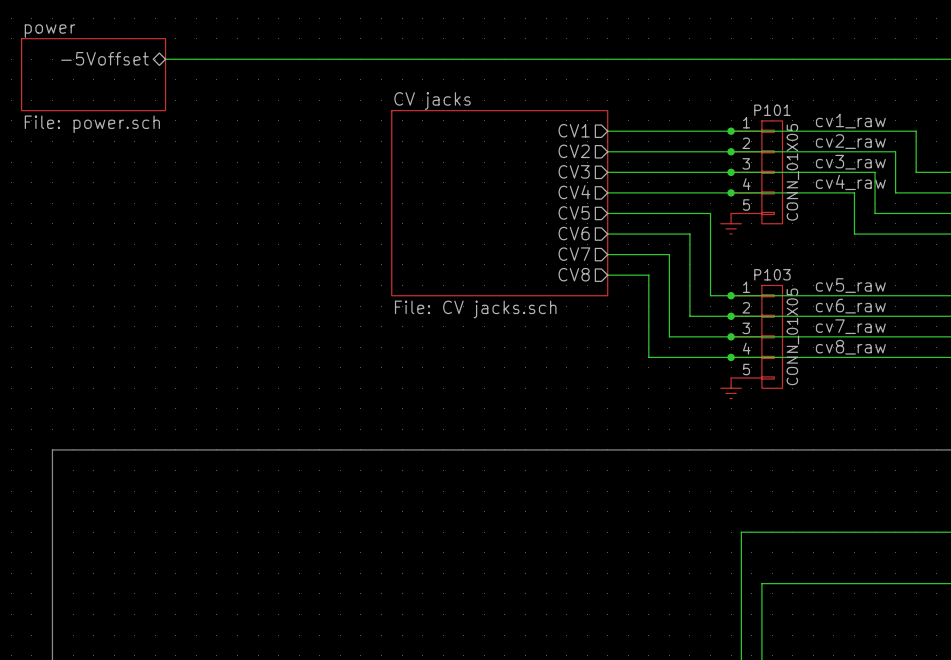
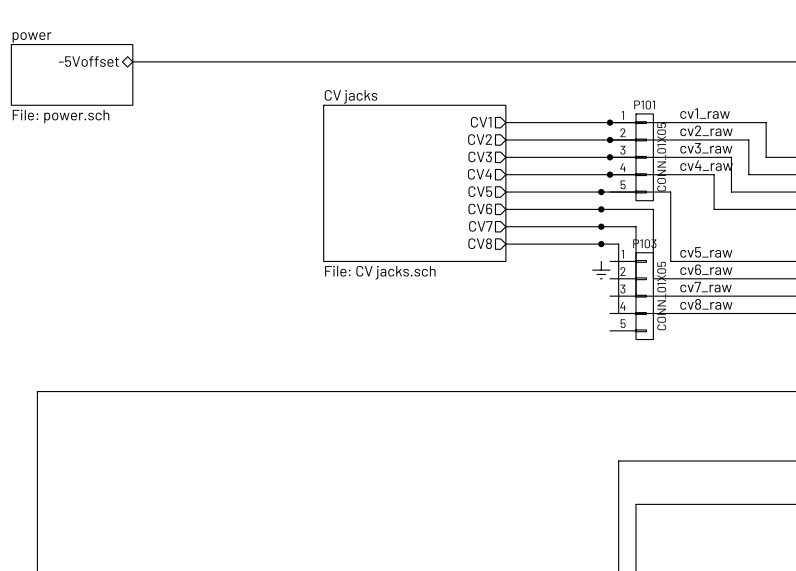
wire: (710, 213) (710, 295) (803, 295) -> (592, 192) (670, 192) (670, 261)
junction: none -> (601, 192)
power symbol: (731, 223) -> none
wire: (689, 234) (689, 316) (782, 316) -> (575, 209) (653, 209) (653, 278)
junction: none -> (601, 209)
wire: (669, 254) (669, 336) (761, 336) -> (557, 226) (636, 226) (636, 296)
junction: none -> (601, 226)
wire: (648, 275) (648, 357) (741, 357) -> (540, 244) (618, 244) (618, 313)
junction: none -> (601, 244)
junction: (731, 295) -> none
power symbol: none -> (601, 270)
junction: (731, 316) -> none
junction: (731, 336) -> none
junction: (731, 357) -> none
power symbol: (731, 388) -> none

